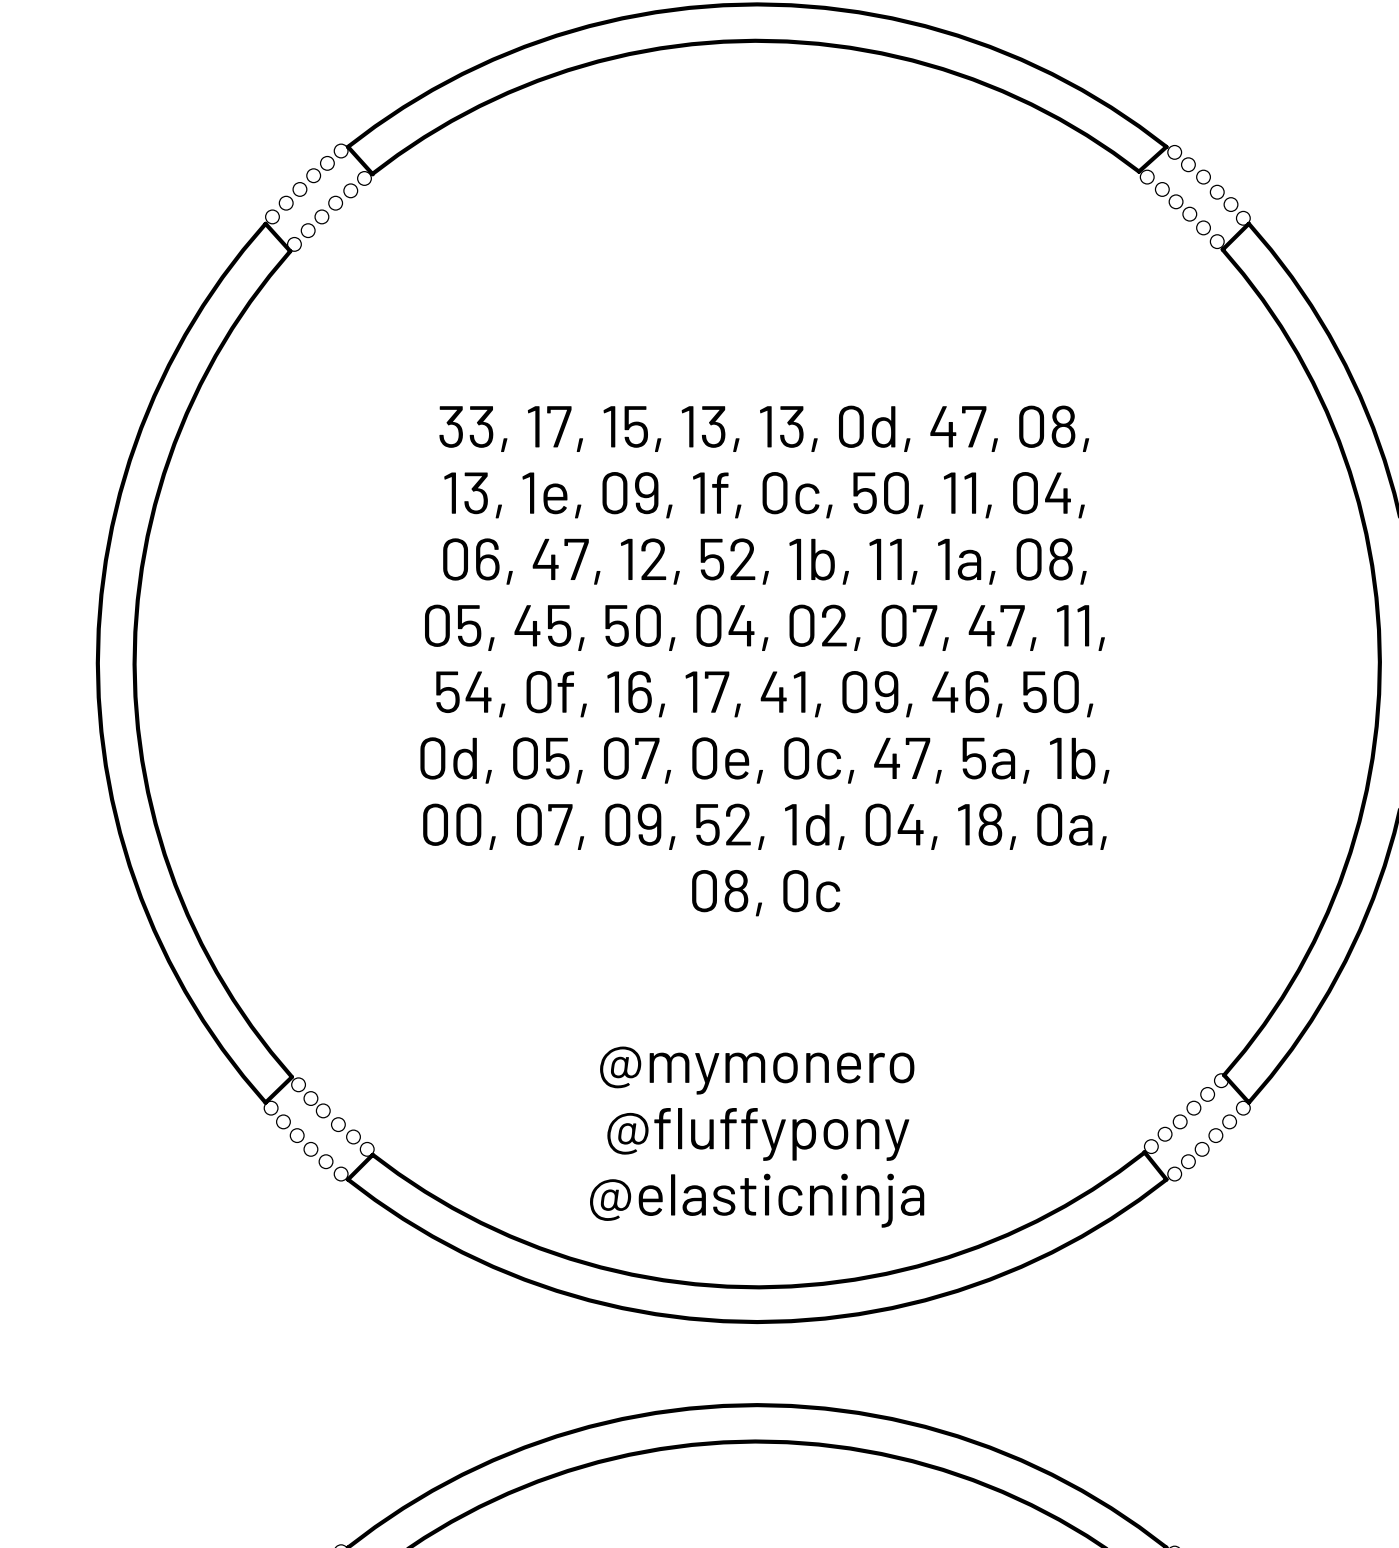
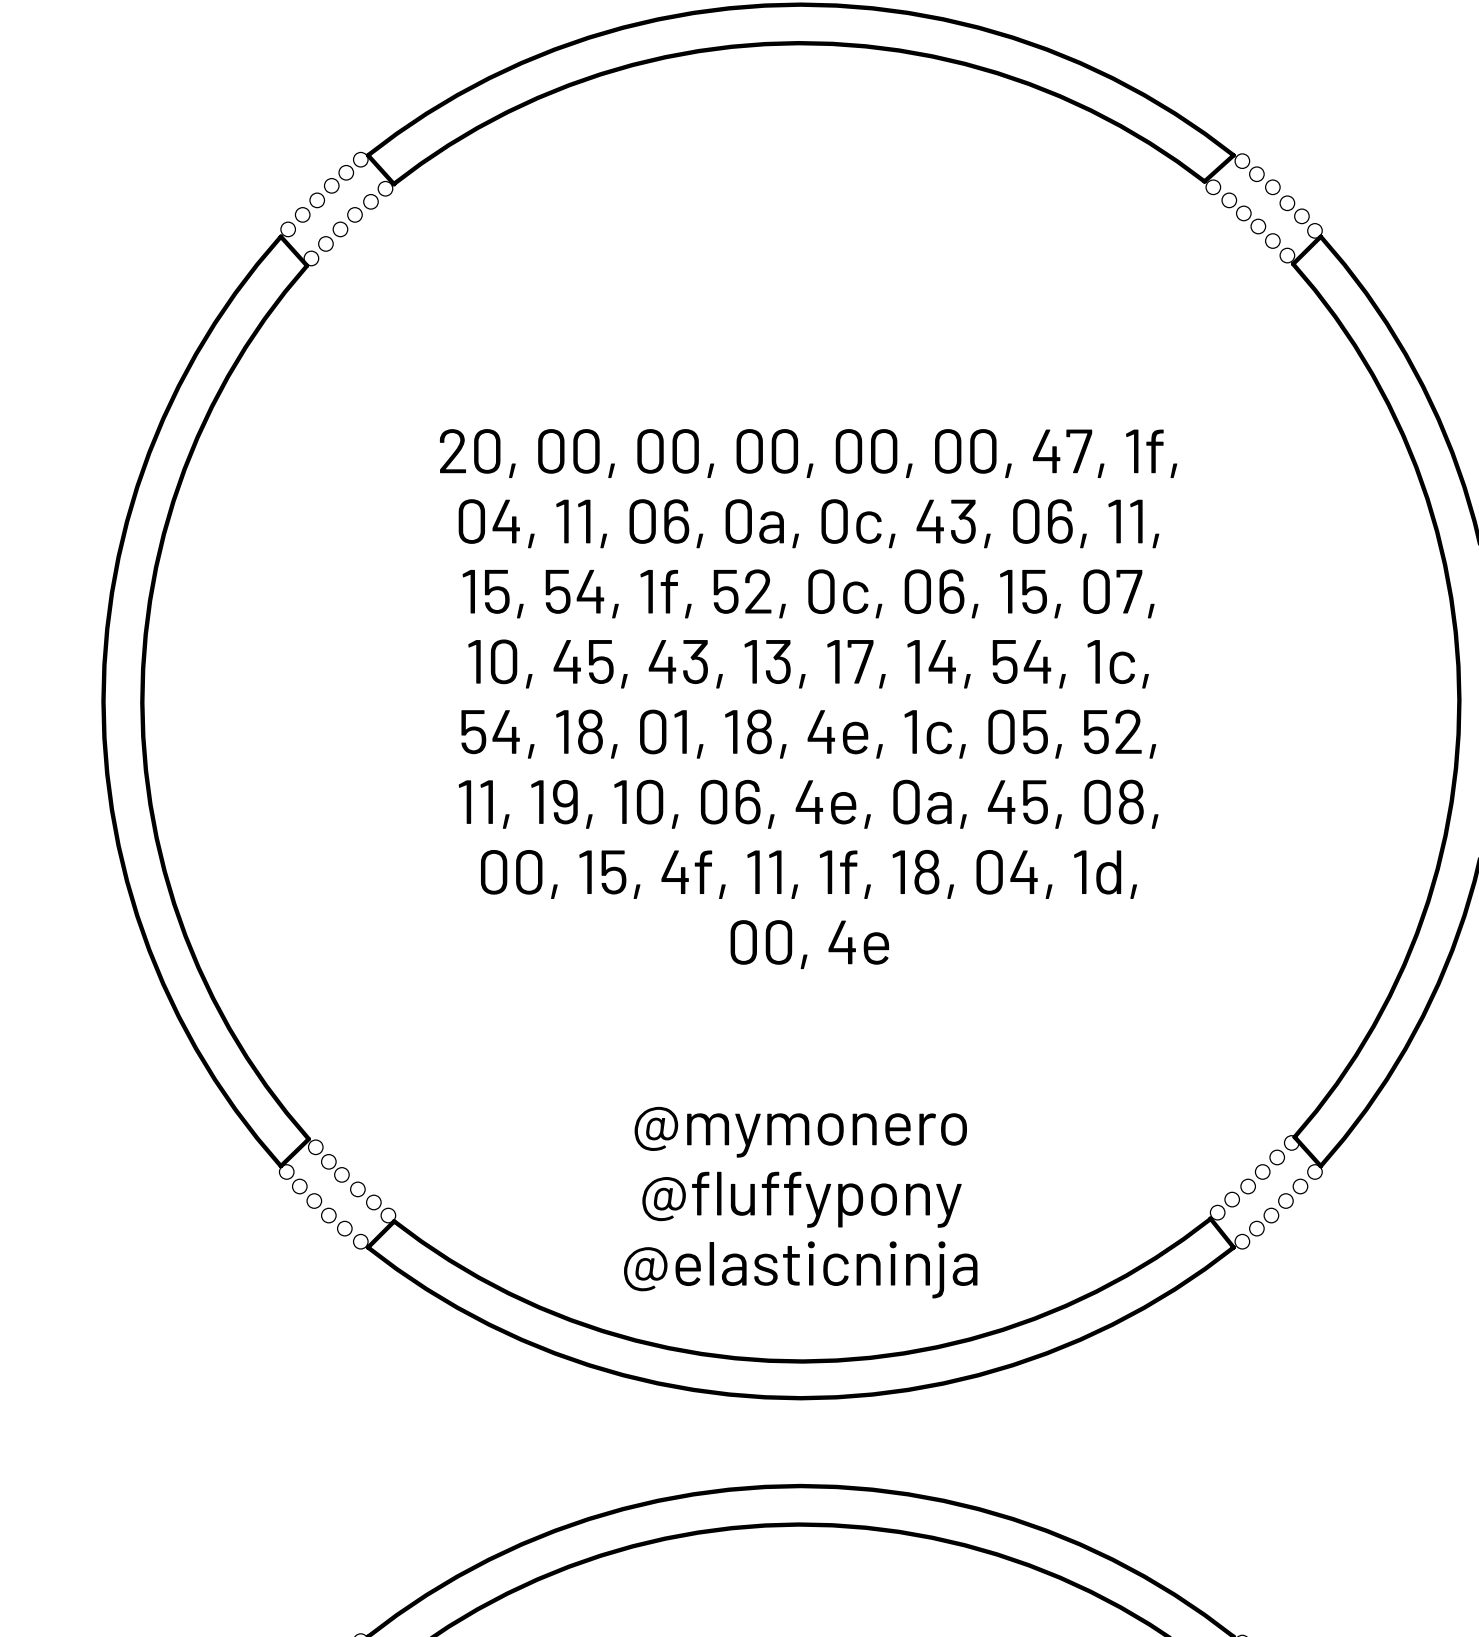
text: 33, 17, 15, 13, 13, 0d, 47, 08, (764, 428) -> 20, 00, 00, 00, 00, 00, 47, 1f, (808, 453)
text: 13, 1e, 09, 1f, 0c, 50, 11, 04, (764, 495) -> 04, 11, 06, 0a, 0c, 43, 06, 11, (809, 523)
text: 06, 47, 12, 52, 1b, 11, 1a, 08, (764, 561) -> 15, 54, 1f, 52, 0c, 06, 15, 07, (808, 593)
text: 05, 45, 50, 04, 02, 07, 47, 11, (764, 627) -> 10, 45, 43, 13, 17, 14, 54, 1c, (808, 664)
text: 54, 0f, 16, 17, 41, 09, 46, 50, (764, 694) -> 54, 18, 01, 18, 4e, 1c, 05, 52, (808, 734)
text: 0d, 05, 07, 0e, 0c, 47, 5a, 1b, (764, 760) -> 11, 19, 10, 06, 4e, 0a, 45, 08, (808, 804)
text: 00, 07, 09, 52, 1d, 04, 18, 0a, (764, 826) -> 00, 15, 4f, 11, 1f, 18, 04, 1d, (809, 874)
text: 08, 0c (766, 893) -> 00, 4e (809, 944)

